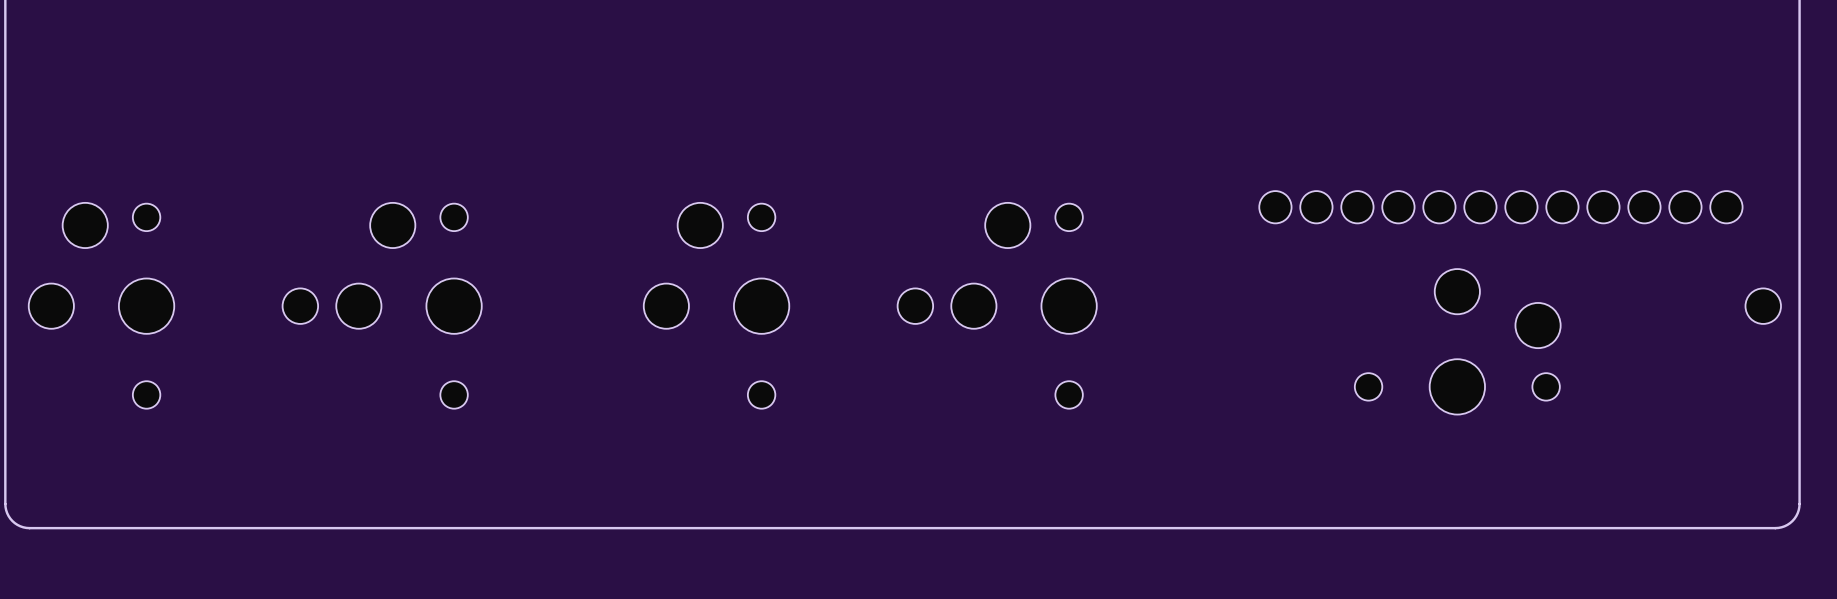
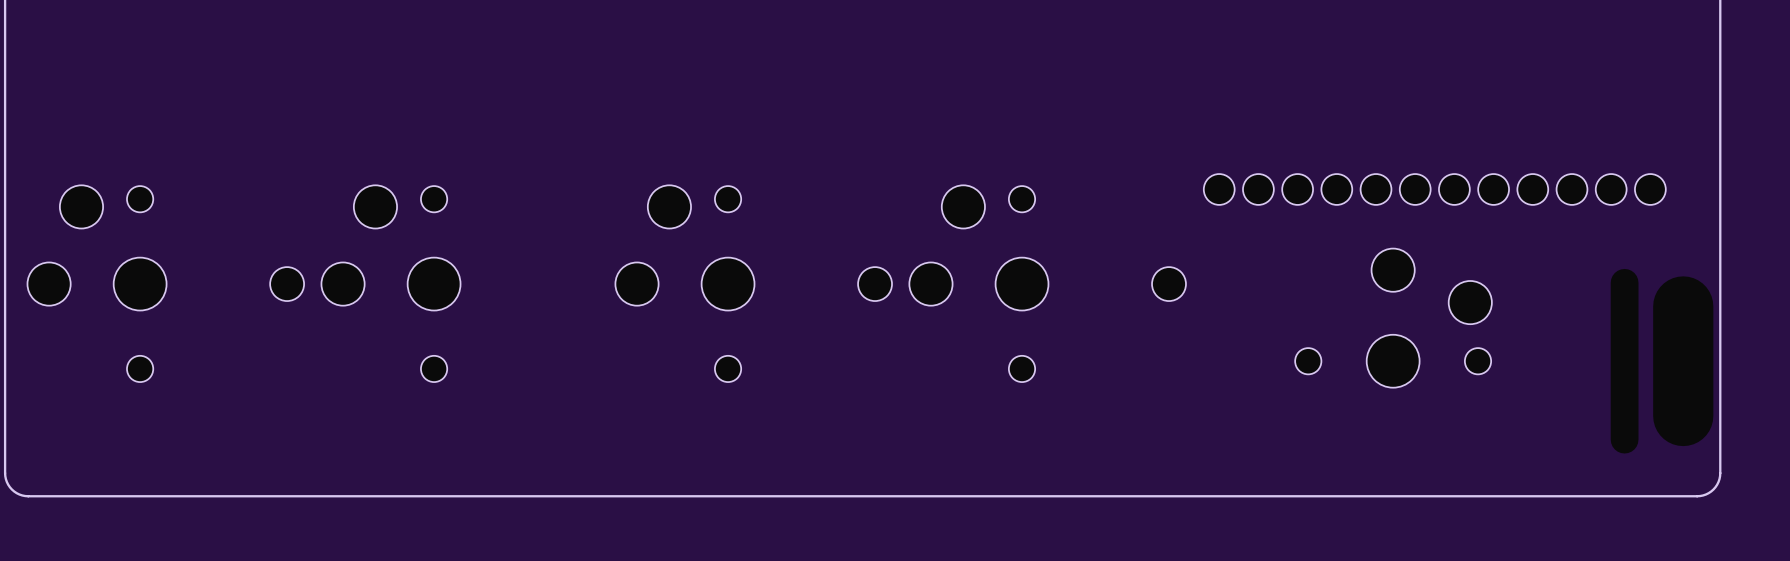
part: none -> (1169, 284)
part: (1763, 306) -> none
part: none -> (1624, 361)
part: none -> (1683, 361)

